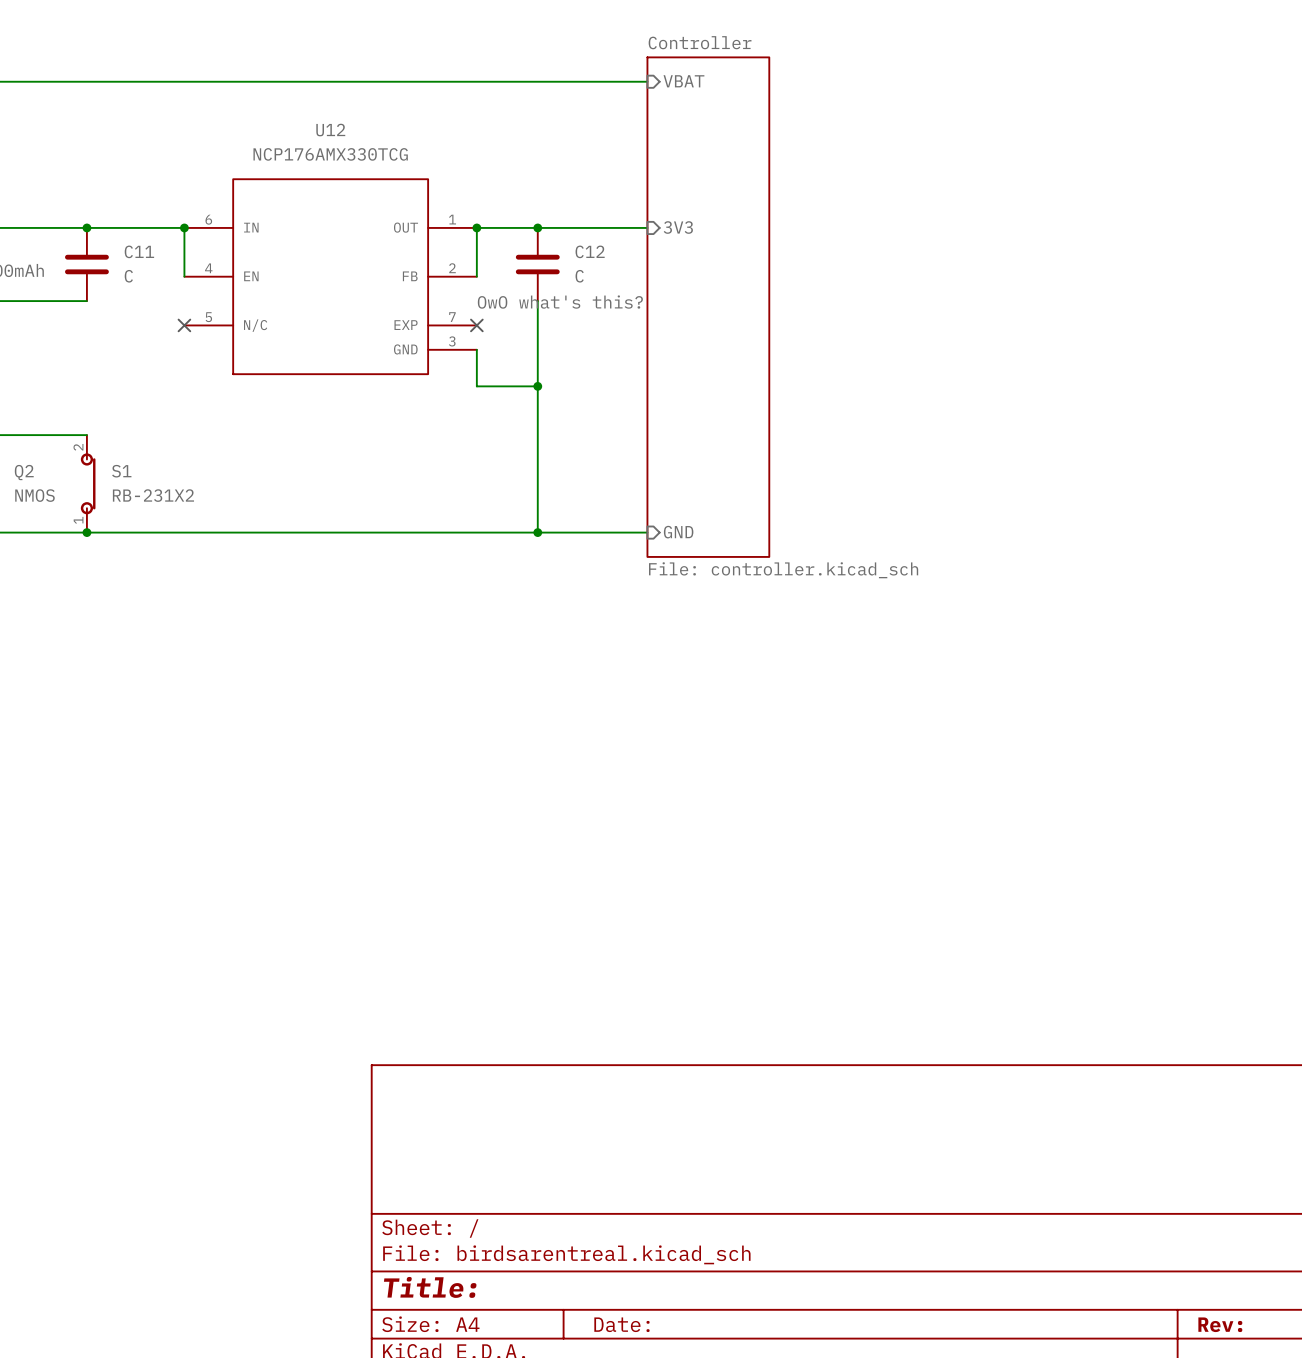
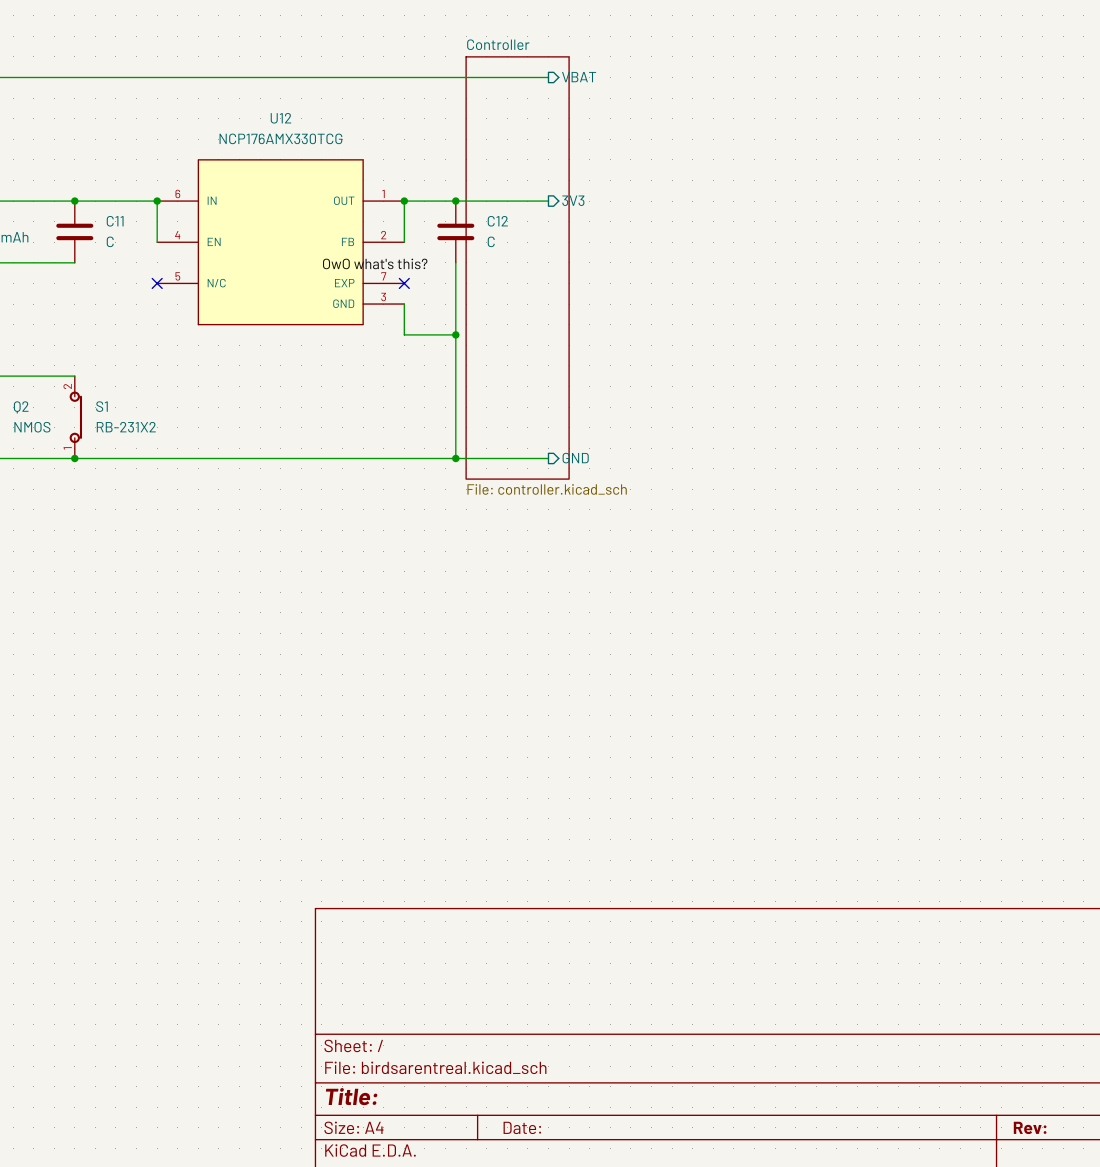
label position: OwO what's this? (560, 302) -> OwO what's this? (375, 263)
sheet Controller position: (708, 307) -> (517, 267)

